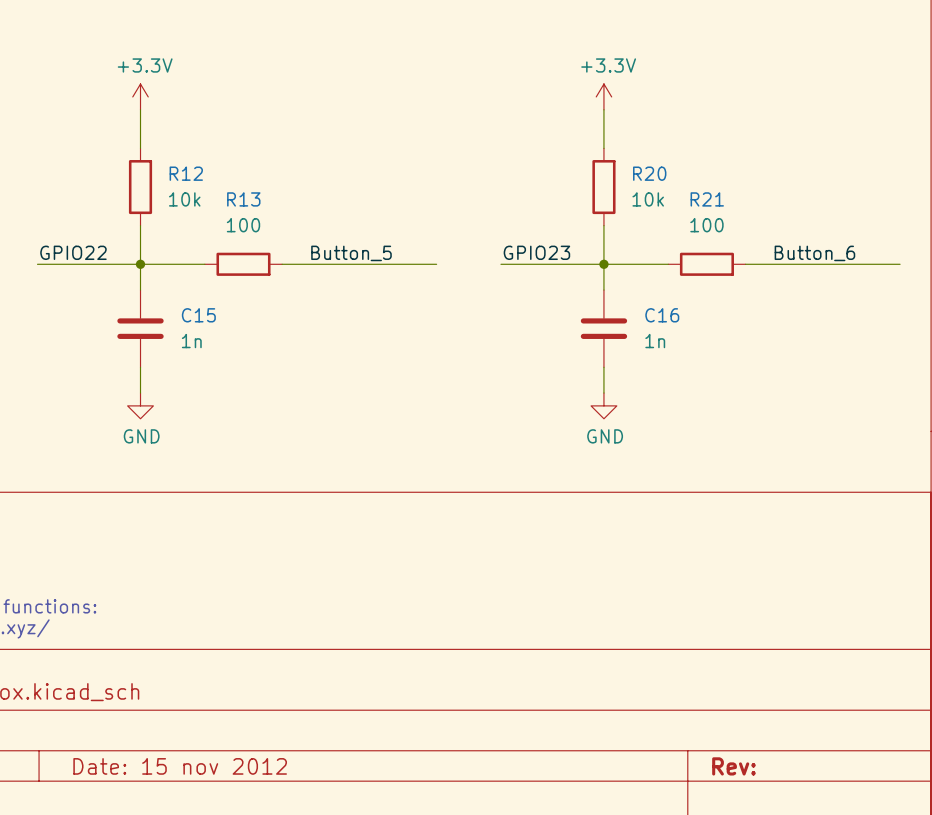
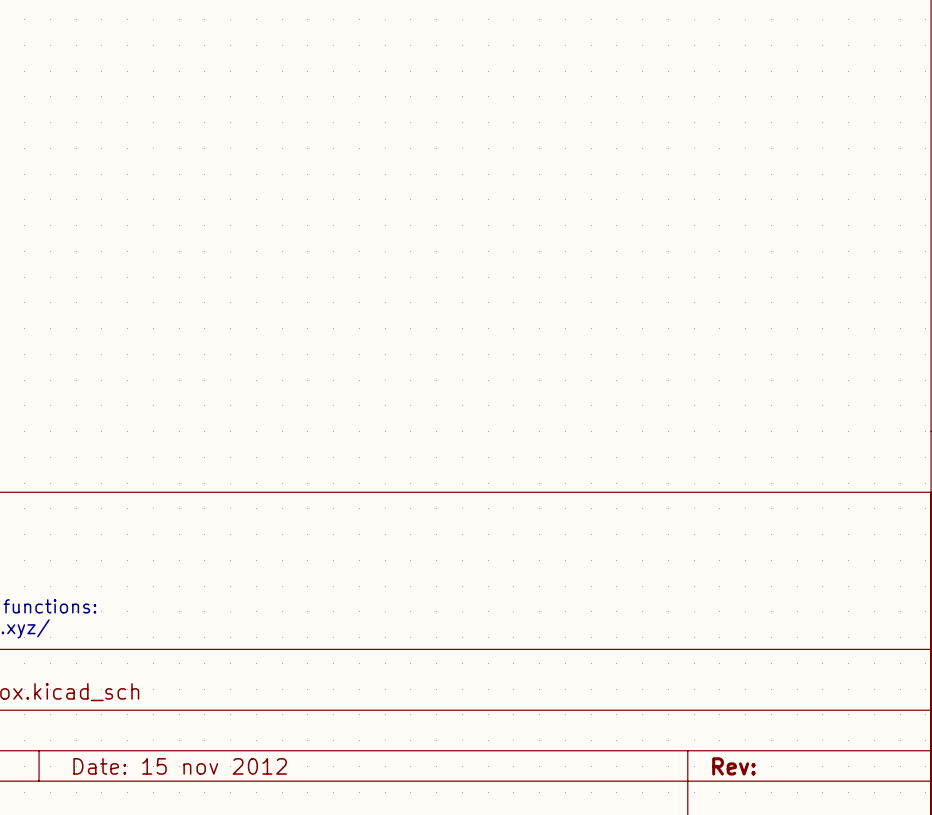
power symbol: +3.3V (140, 96) -> none
power symbol: +3.3V (603, 96) -> none
wire: (140, 109) (140, 148) -> none
wire: (603, 109) (603, 148) -> none
R12: 10k (140, 187) -> none
R20: 10k (603, 187) -> none
wire: (140, 225) (140, 290) -> none
wire: (603, 225) (603, 290) -> none
label: GPIO22 (73, 252) -> none
label: GPIO23 (536, 252) -> none
label: Button_5 (351, 253) -> none
label: Button_6 (814, 253) -> none
wire: (37, 264) (204, 264) -> none
junction: (140, 264) -> none
R13: 100 (243, 264) -> none
wire: (282, 264) (436, 264) -> none
wire: (500, 264) (668, 264) -> none
junction: (603, 264) -> none
R21: 100 (706, 264) -> none
wire: (745, 264) (900, 264) -> none
C15: 1n (140, 328) -> none
C16: 1n (603, 328) -> none
wire: (140, 367) (140, 393) -> none
wire: (603, 367) (603, 393) -> none
power symbol: GND (140, 405) -> none
power symbol: GND (603, 405) -> none

